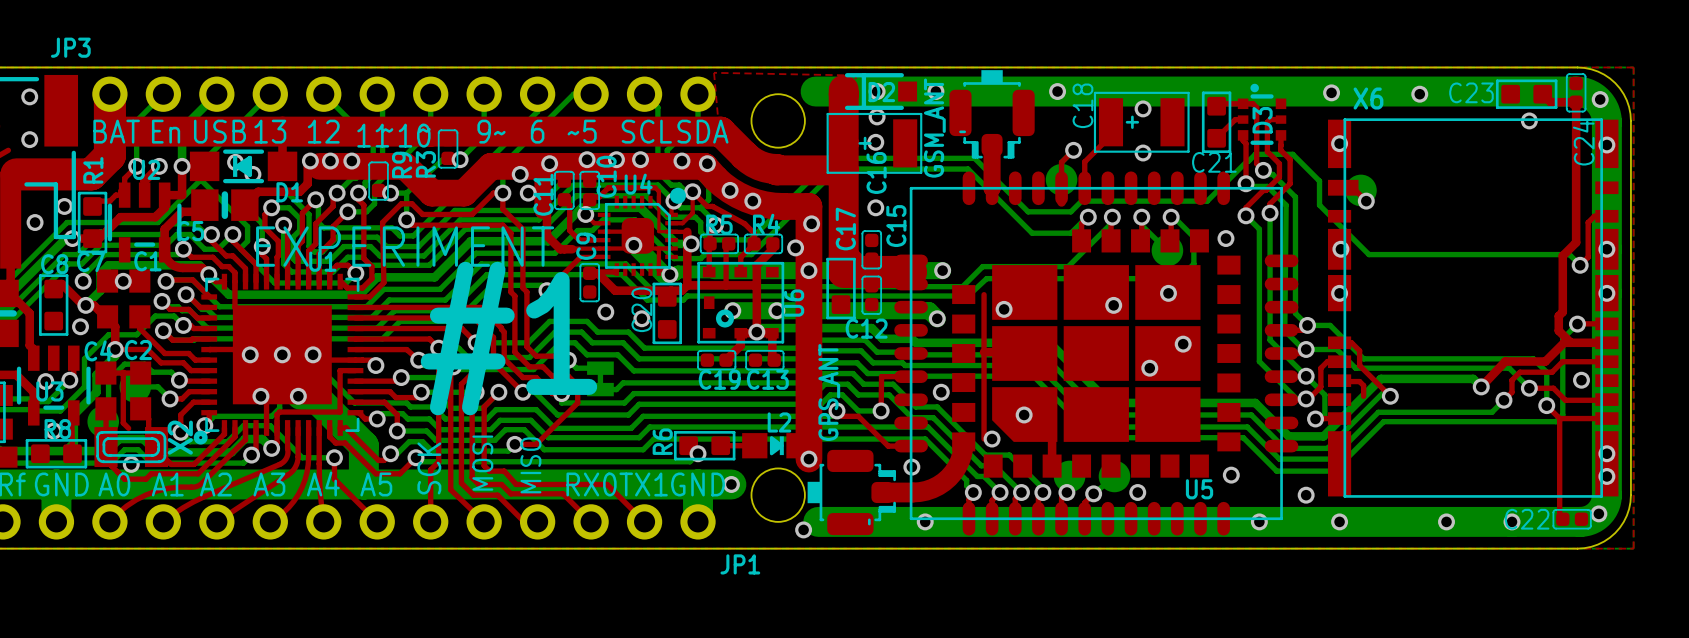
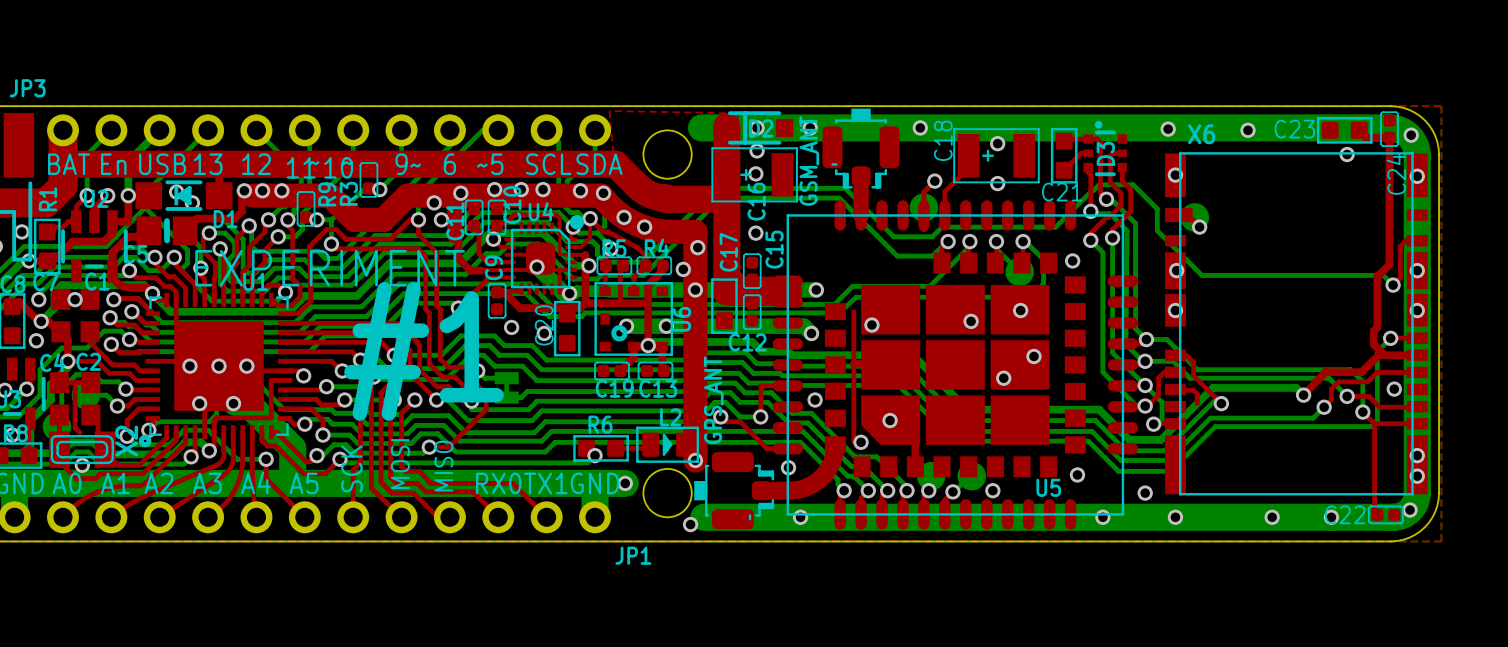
L2 footprint: [742, 433, 812, 459] -> [636, 426, 700, 463]
R6 name rotation: 0° (662, 441) -> 90° clockwise (600, 424)
R6 name position: R6 (662, 441) -> R6 (600, 424)

